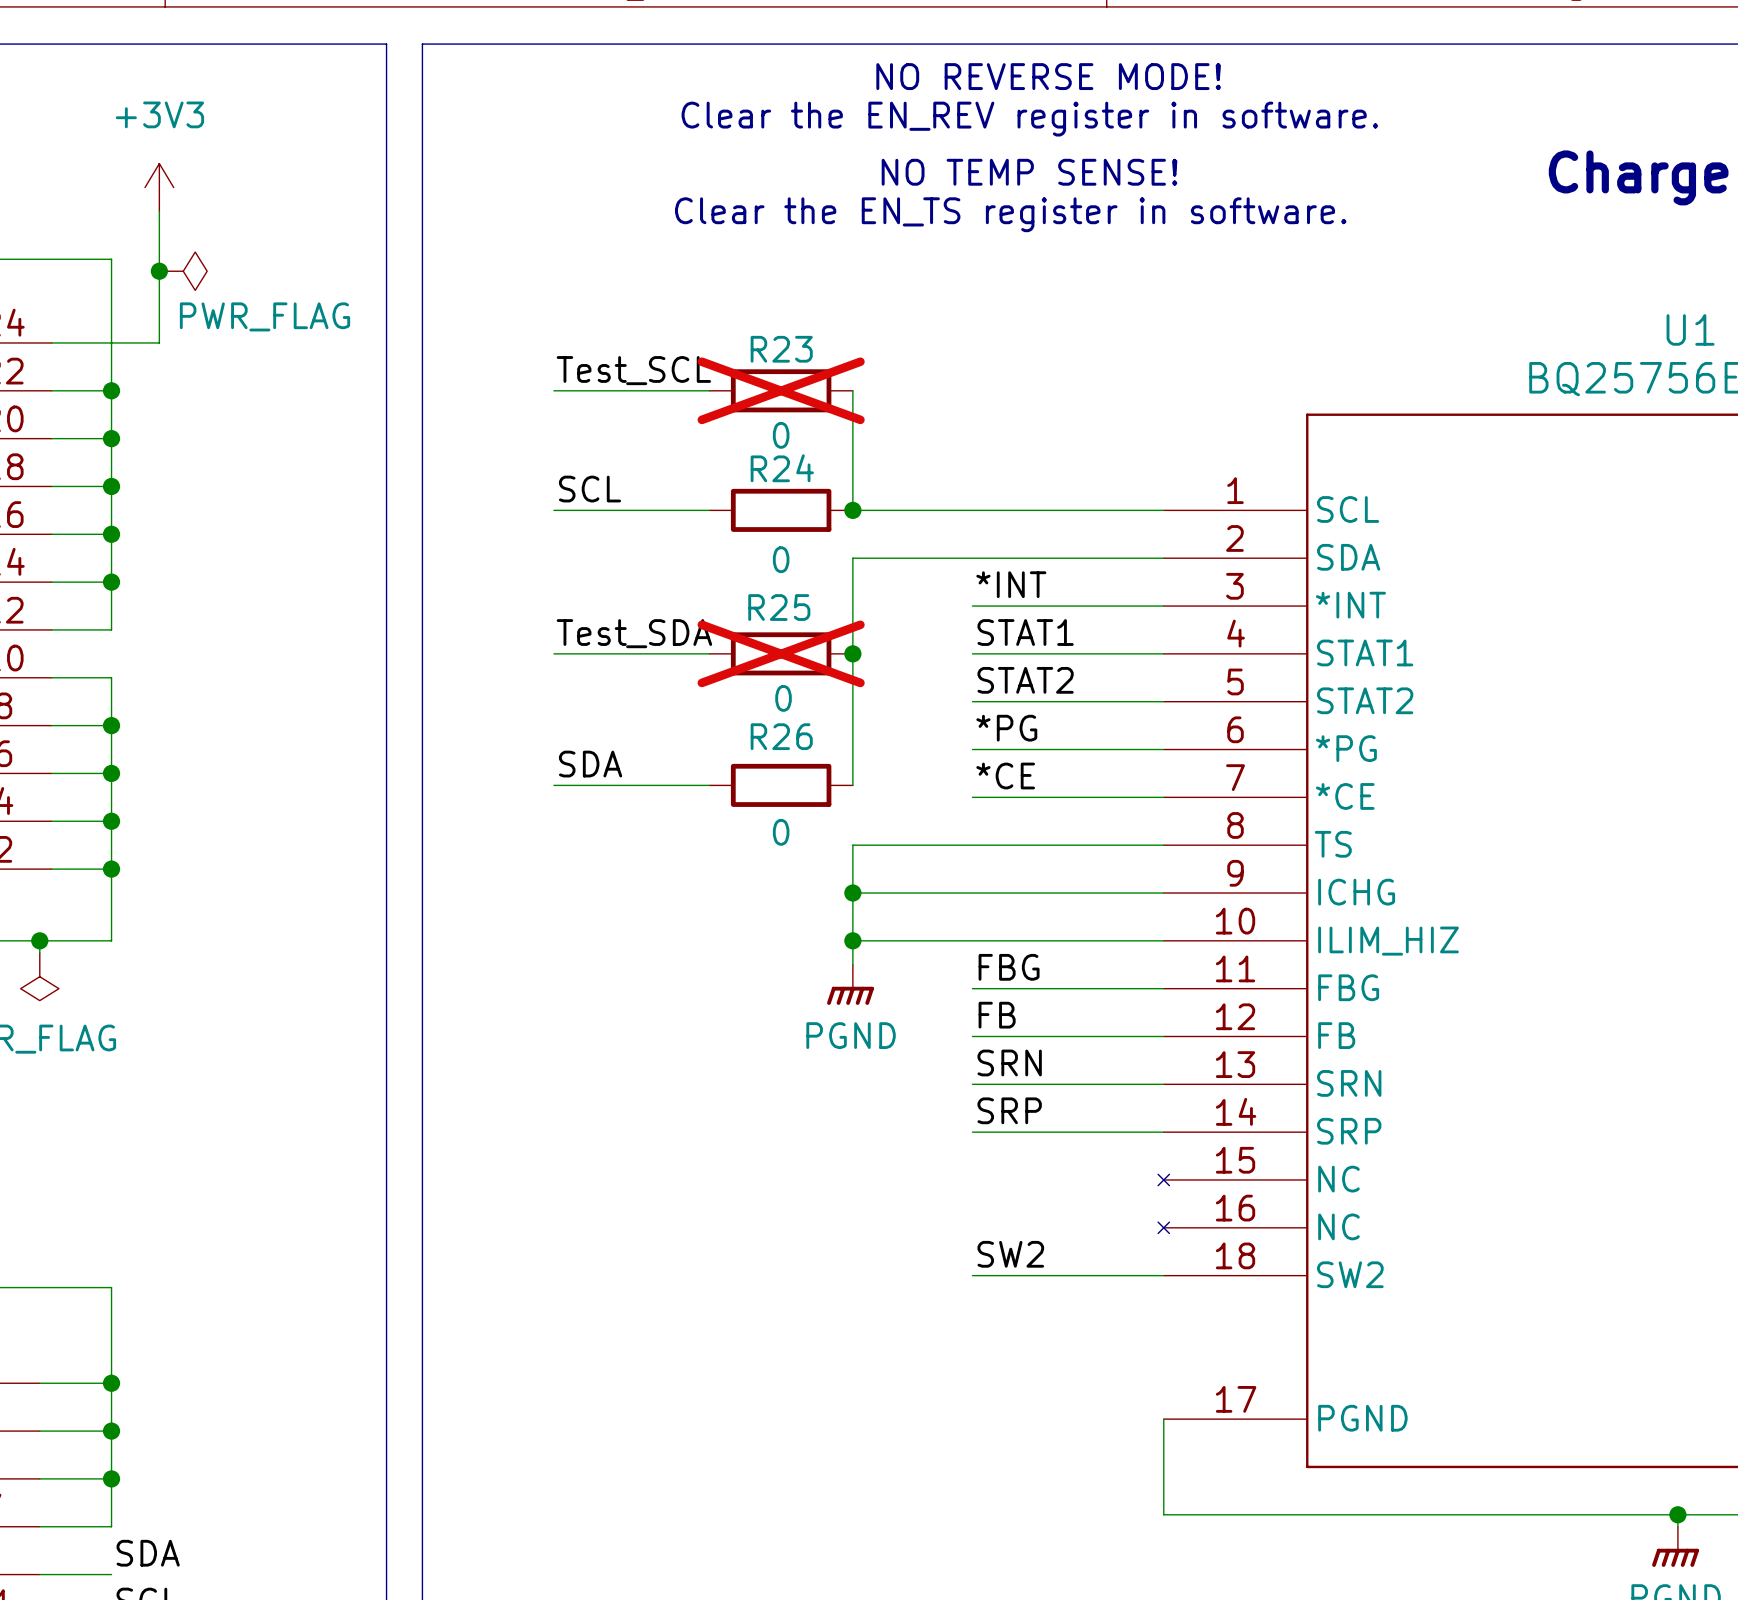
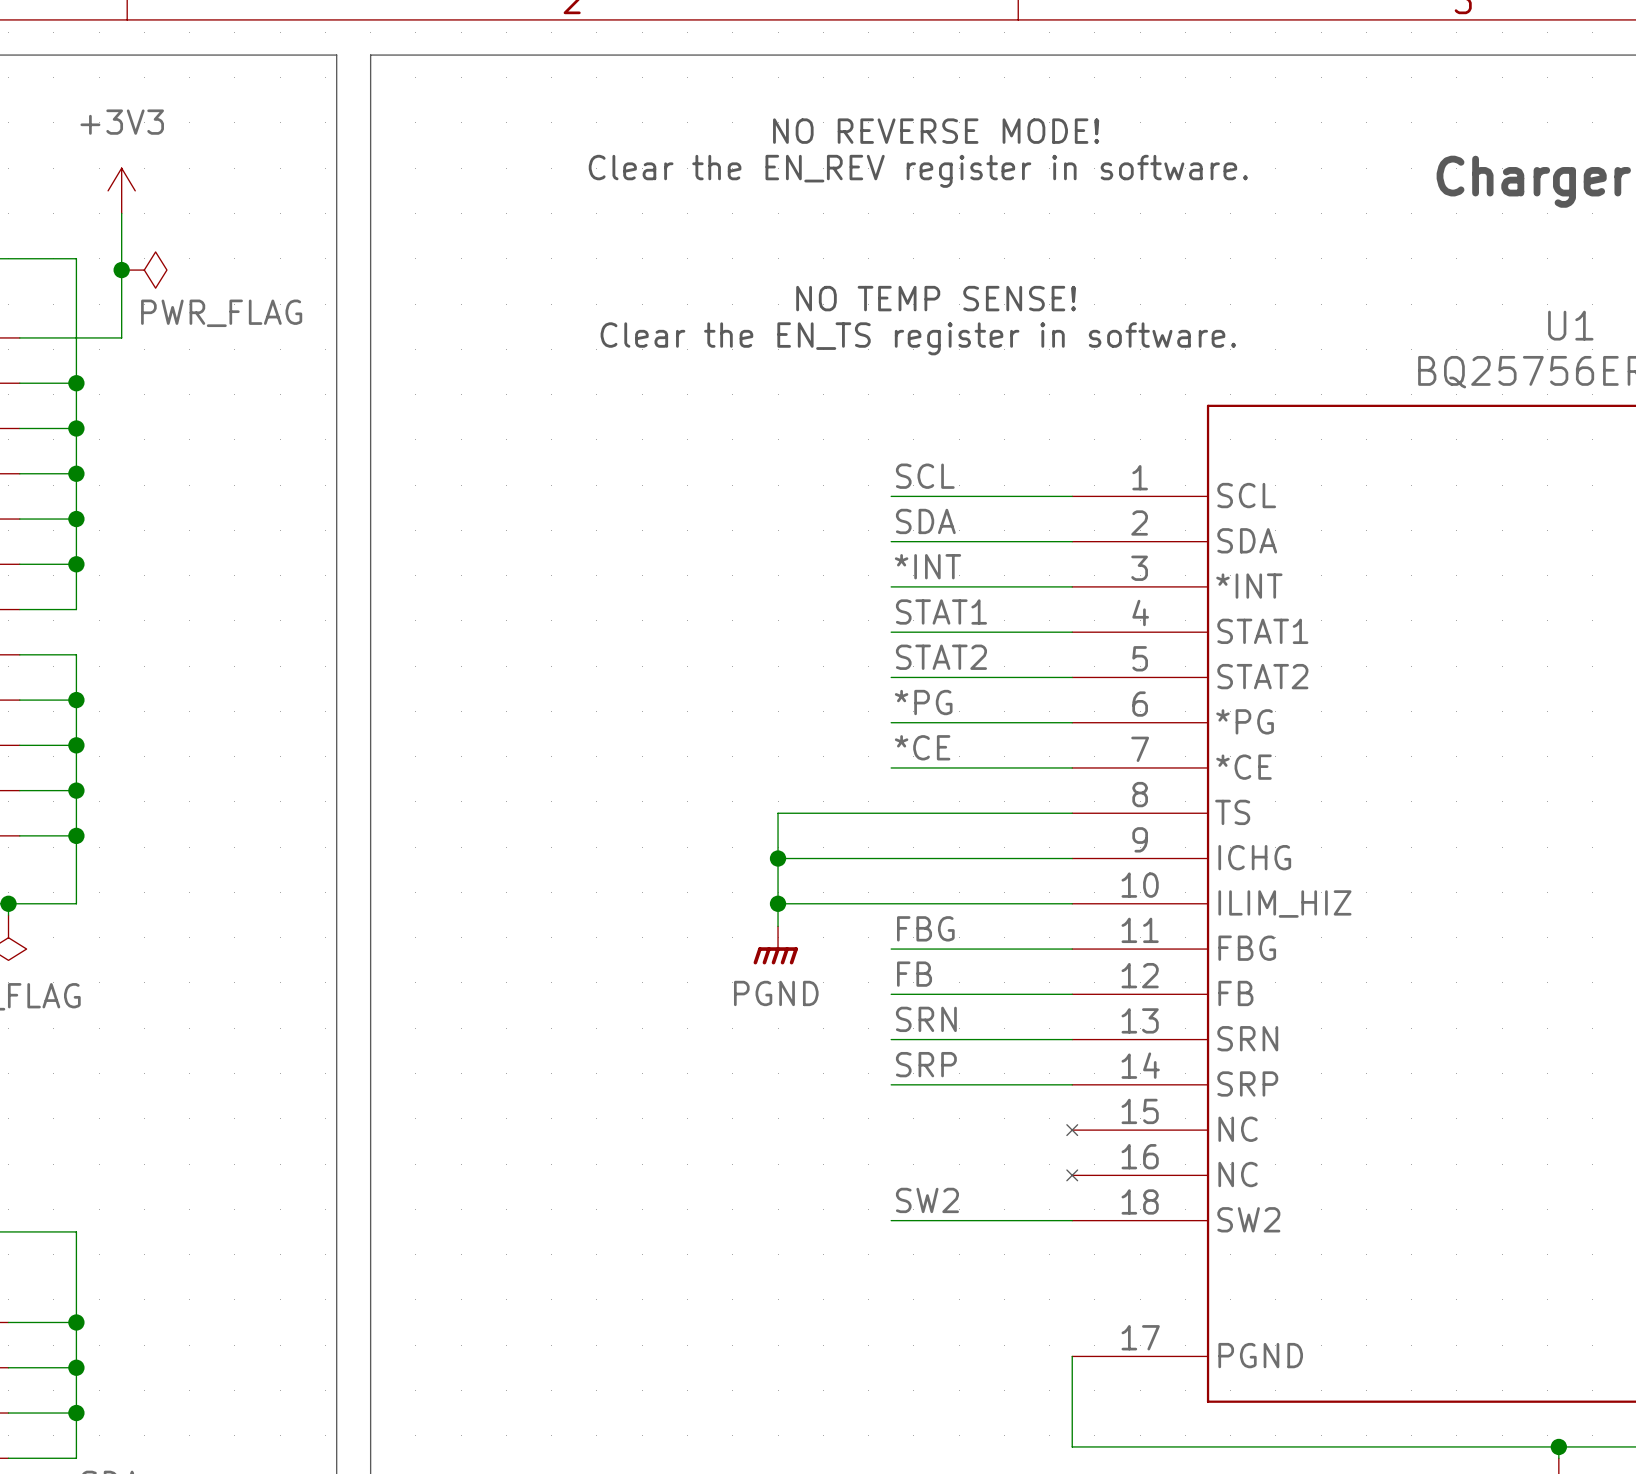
text position: NO REVERSE MODE! (1048, 76) -> NO REVERSE MODE! (936, 131)
text position: Clear the EN_REV register in software. (1029, 119) -> Clear the EN_REV register in software. (918, 171)
text position: NO TEMP SENSE! (1029, 172) -> NO TEMP SENSE! (936, 298)
text position: Clear the EN_TS register in software. (1010, 214) -> Clear the EN_TS register in software. (918, 338)
label: Test_SCL (633, 370) -> none
wire: (553, 390) (709, 390) -> none
R23: 0 (781, 390) -> none
wire: (852, 390) (852, 510) (972, 510) -> none
label position: SCL (590, 489) -> SCL (925, 476)
wire: (553, 510) (709, 510) -> none
R24: 0 (781, 510) -> none
junction: (852, 510) -> none
label: none -> SDA (925, 521)
wire: (972, 558) (852, 558) (852, 785) -> none
label: Test_SDA (634, 633) -> none
wire: (553, 653) (709, 653) -> none
R25: 0 (781, 653) -> none
junction: (852, 653) -> none
label: SDA (590, 764) -> none
wire: (553, 785) (709, 785) -> none
R26: 0 (781, 785) -> none

